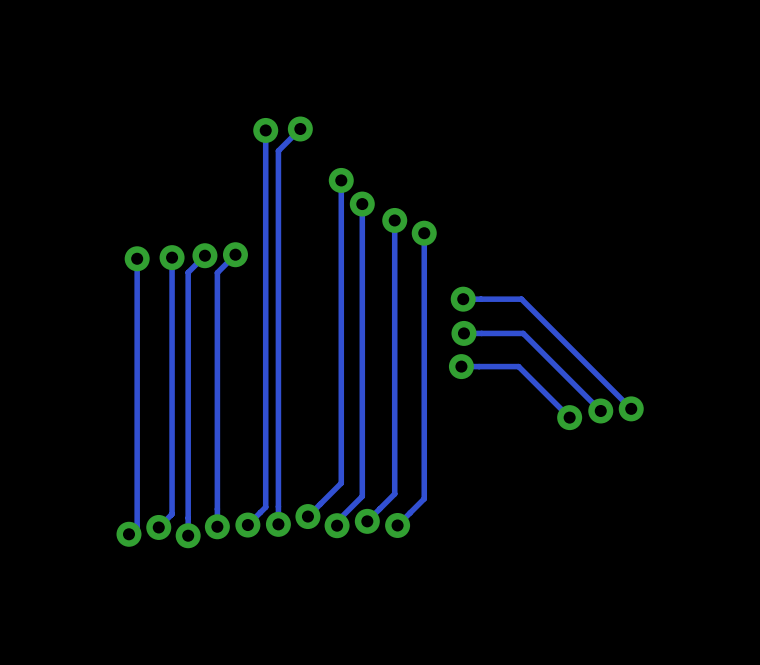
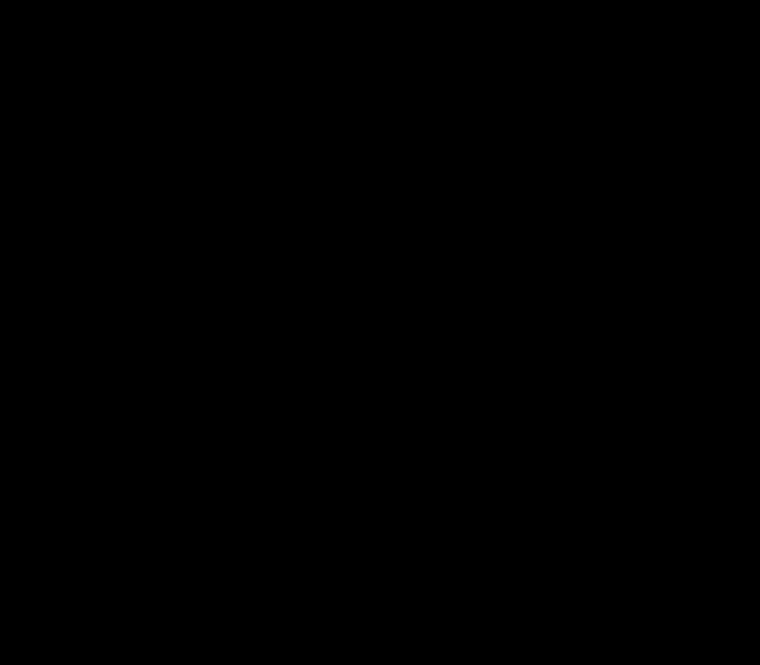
track: (300, 128) (278, 150) (278, 524) -> none
via: (300, 128) -> none
track: (265, 130) (265, 507) (247, 525) -> none
via: (265, 130) -> none
track: (341, 180) (341, 483) (307, 516) -> none
via: (341, 180) -> none
track: (362, 204) (362, 496) (337, 521) (337, 525) -> none
via: (362, 204) -> none
track: (394, 220) (394, 493) (367, 521) -> none
via: (394, 220) -> none
track: (424, 233) (424, 498) (397, 525) -> none
via: (424, 233) -> none
track: (235, 254) (217, 272) (217, 526) -> none
via: (235, 254) -> none
track: (204, 255) (188, 272) (188, 535) -> none
via: (204, 255) -> none
track: (172, 257) (172, 514) (158, 527) -> none
via: (172, 257) -> none
track: (137, 258) (137, 526) (128, 534) -> none
via: (137, 258) -> none
track: (463, 299) (521, 299) (631, 408) -> none
via: (463, 299) -> none
track: (463, 333) (523, 333) (600, 410) -> none
via: (463, 333) -> none
track: (461, 366) (518, 366) (569, 417) -> none
via: (461, 366) -> none
via: (631, 408) -> none
via: (600, 410) -> none
via: (569, 417) -> none
via: (307, 516) -> none
via: (367, 521) -> none
via: (278, 524) -> none
via: (247, 525) -> none
via: (337, 525) -> none
via: (397, 525) -> none
via: (217, 526) -> none
via: (158, 527) -> none
via: (128, 534) -> none
via: (188, 535) -> none

